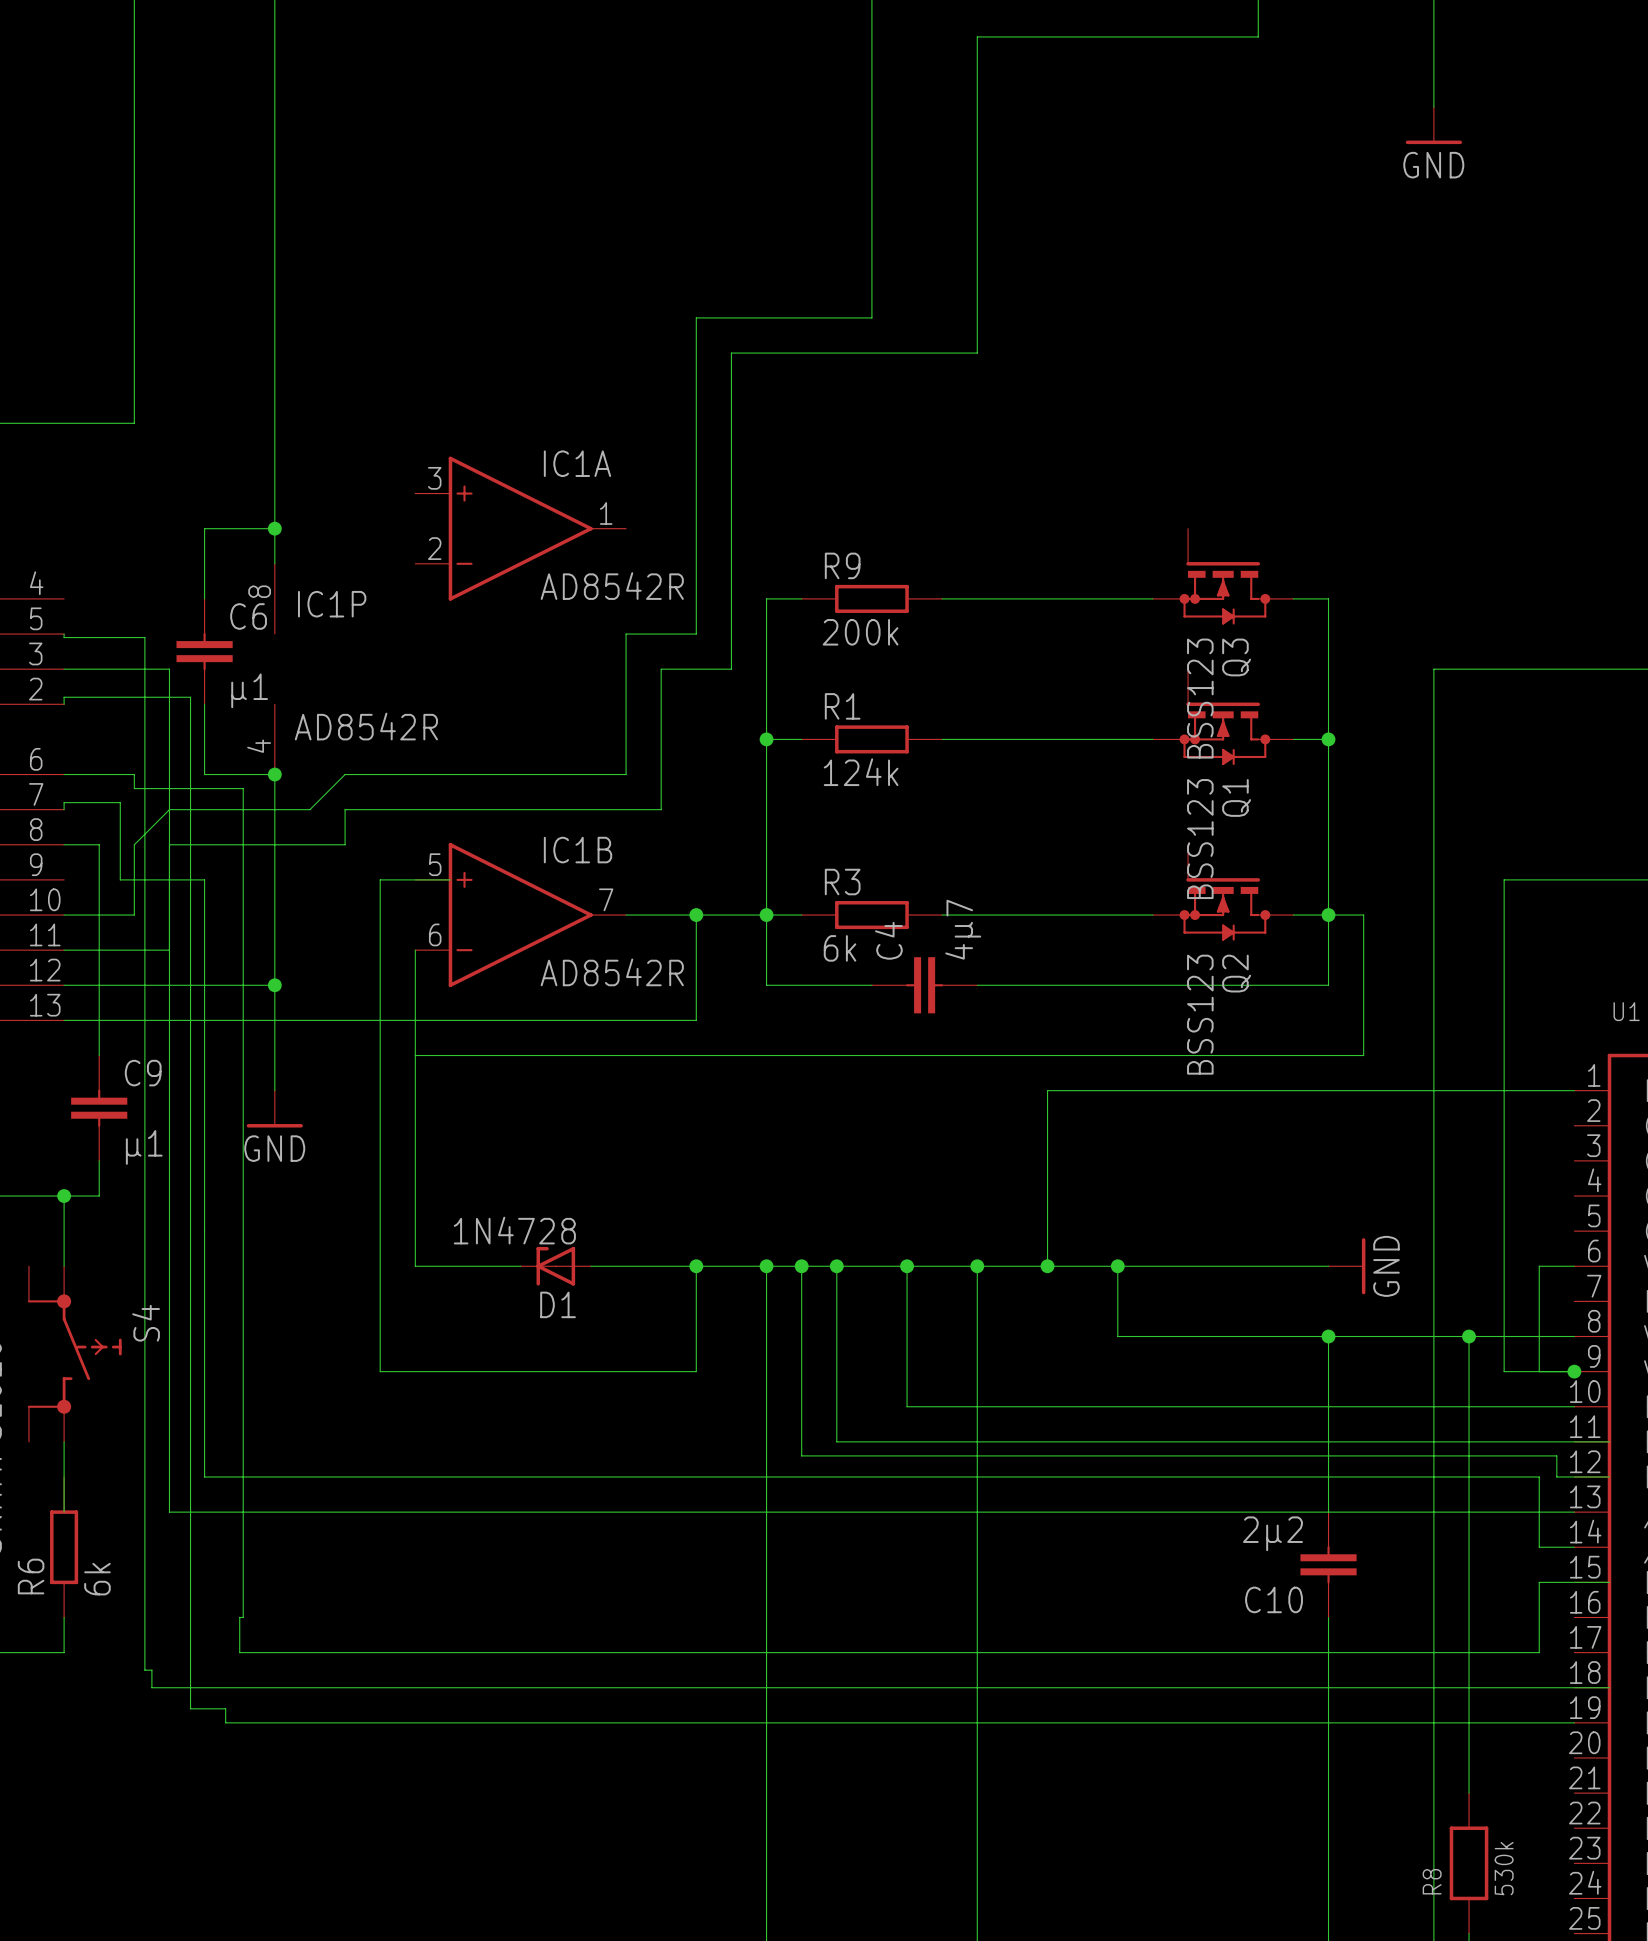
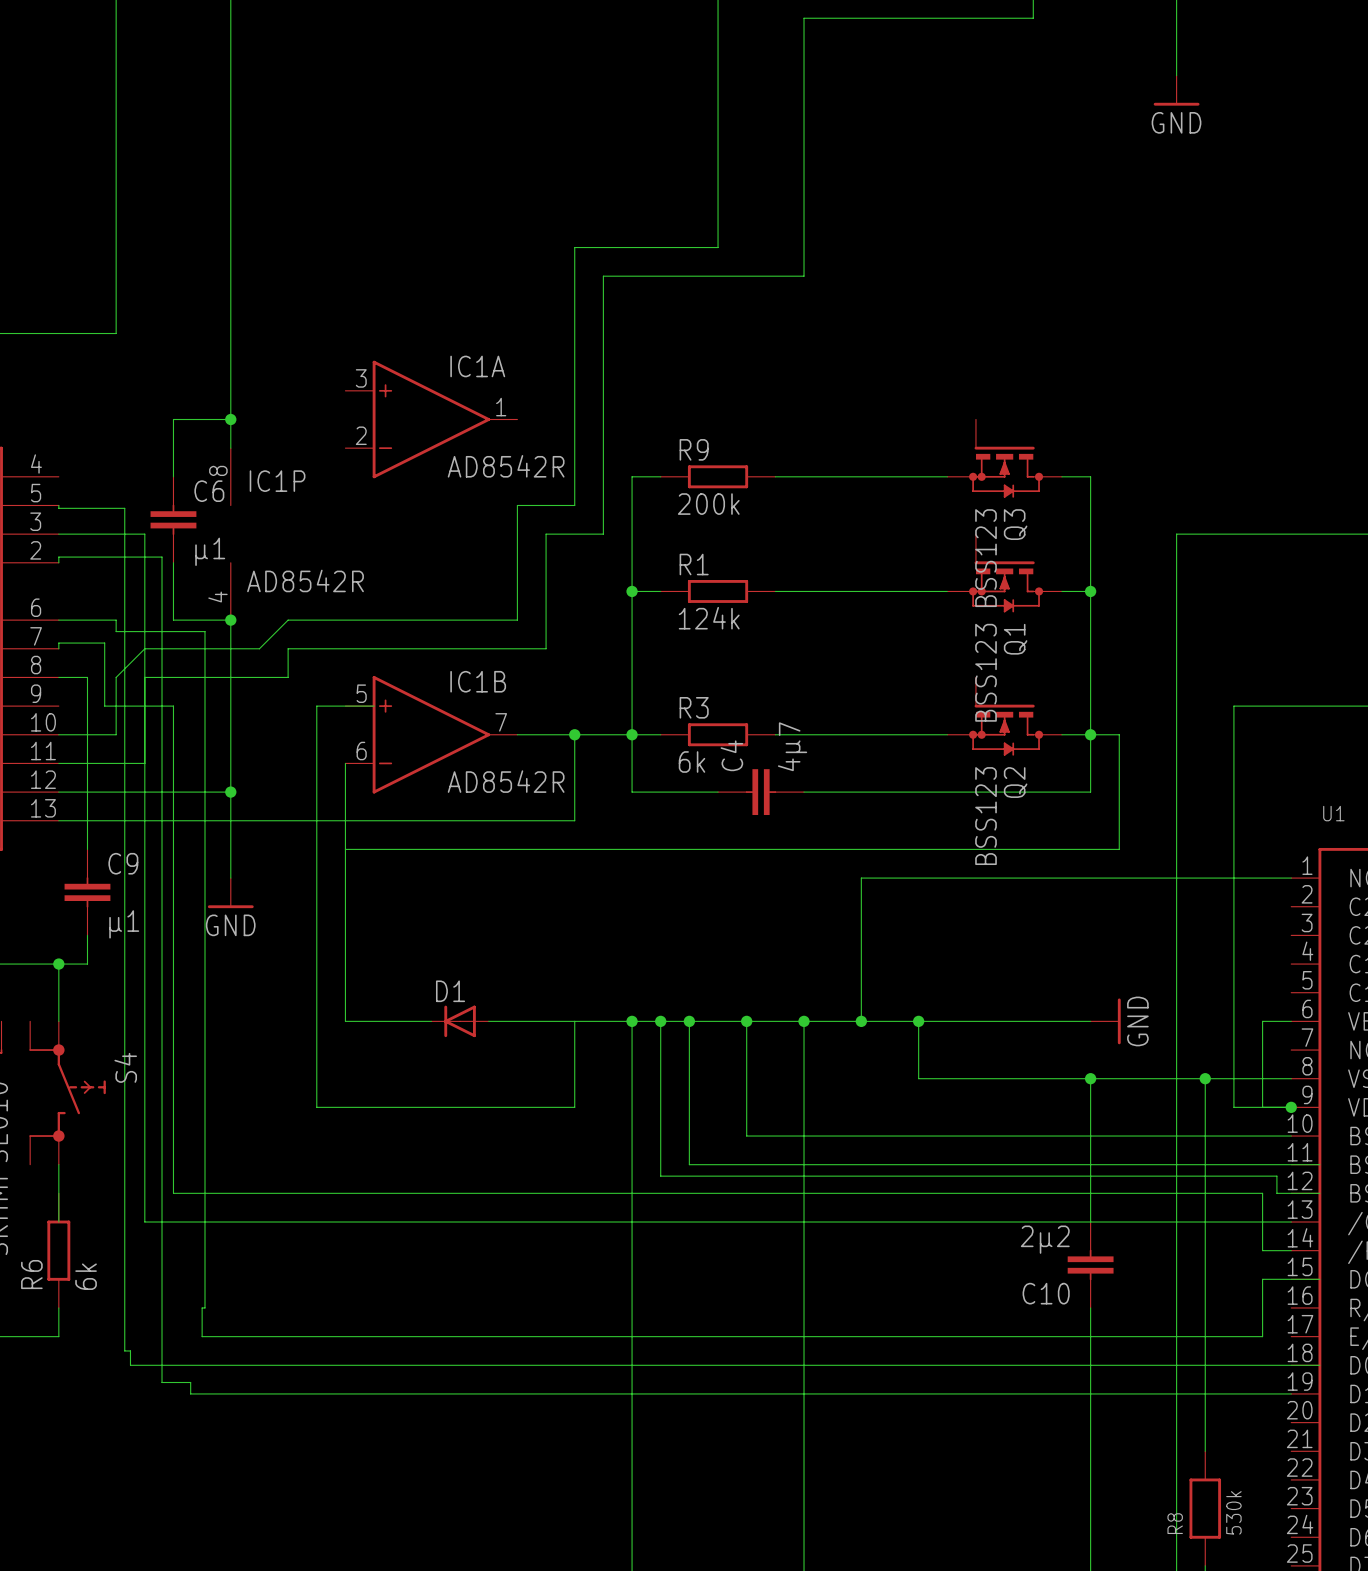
D1 value: 1N4728 (514, 1230) -> none
D1 symbol: [520, 1246, 591, 1286] -> [431, 1005, 489, 1038]
junction: (696, 1266) -> none
D1 name position: D1 (558, 1304) -> D1 (450, 991)

